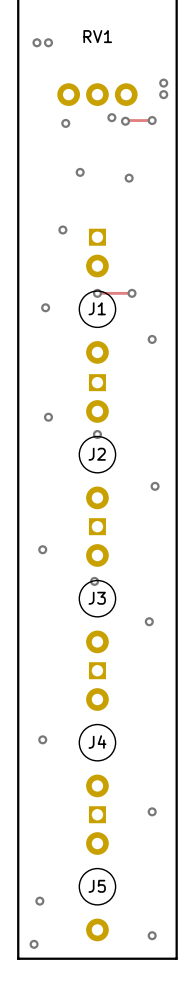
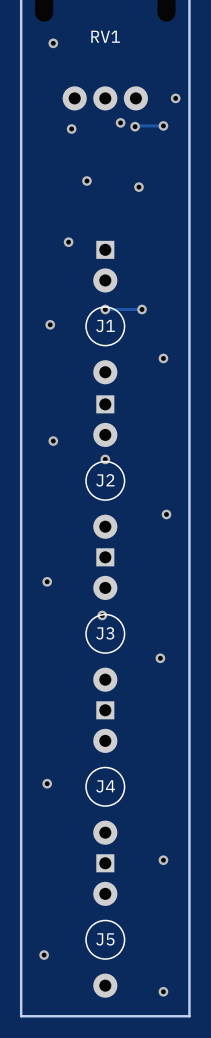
via: (36, 42) -> none
via: (163, 83) -> none
via: (34, 944) -> none

